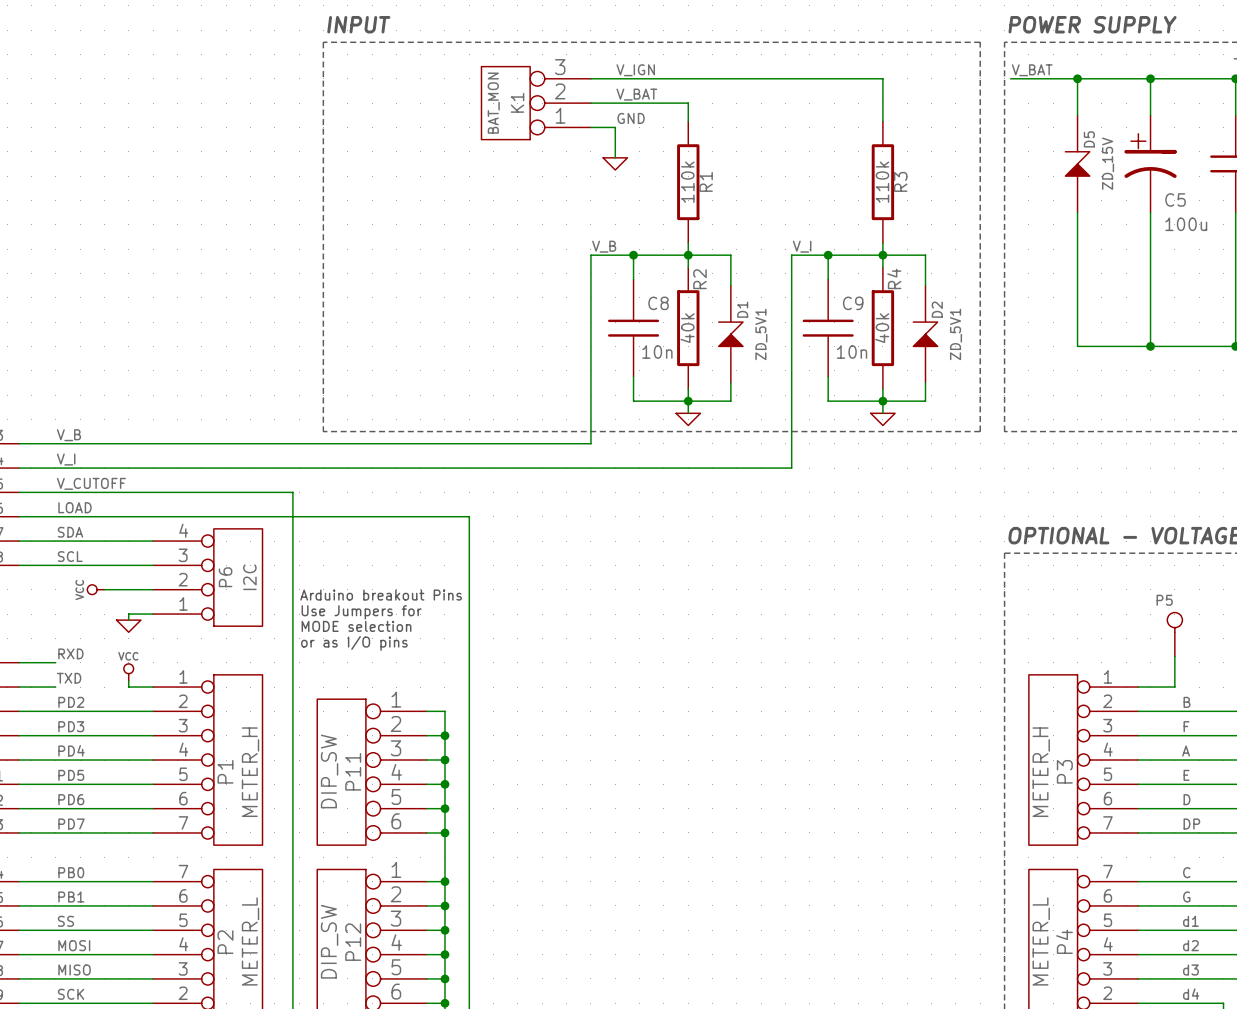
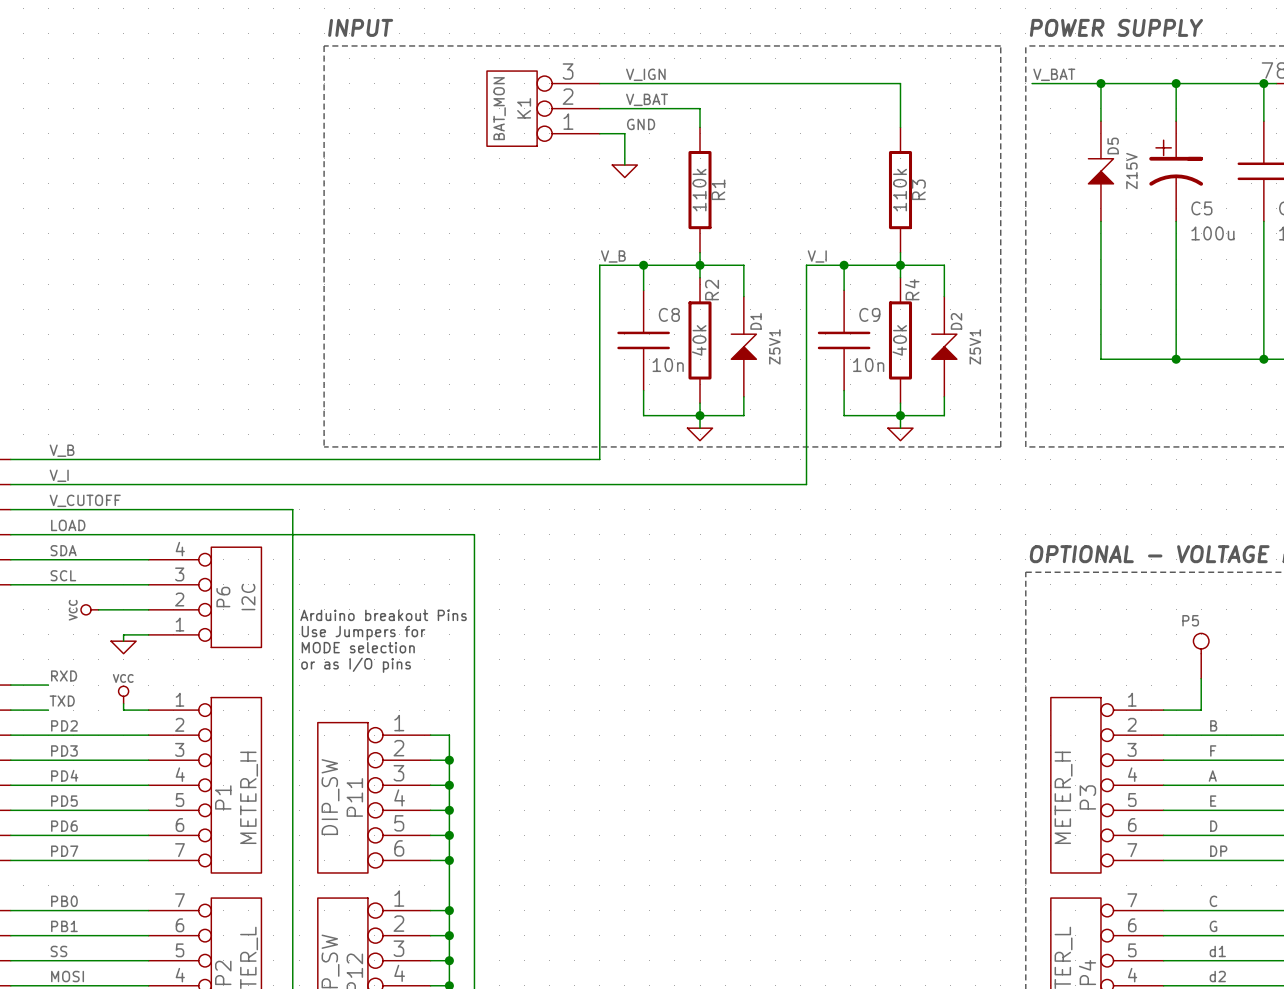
D5 value: ZD_15V (1108, 163) -> Z15V (1131, 171)
D1 value: ZD_5V1 (761, 334) -> Z5V1 (774, 346)
D2 value: ZD_5V1 (956, 334) -> Z5V1 (975, 346)

